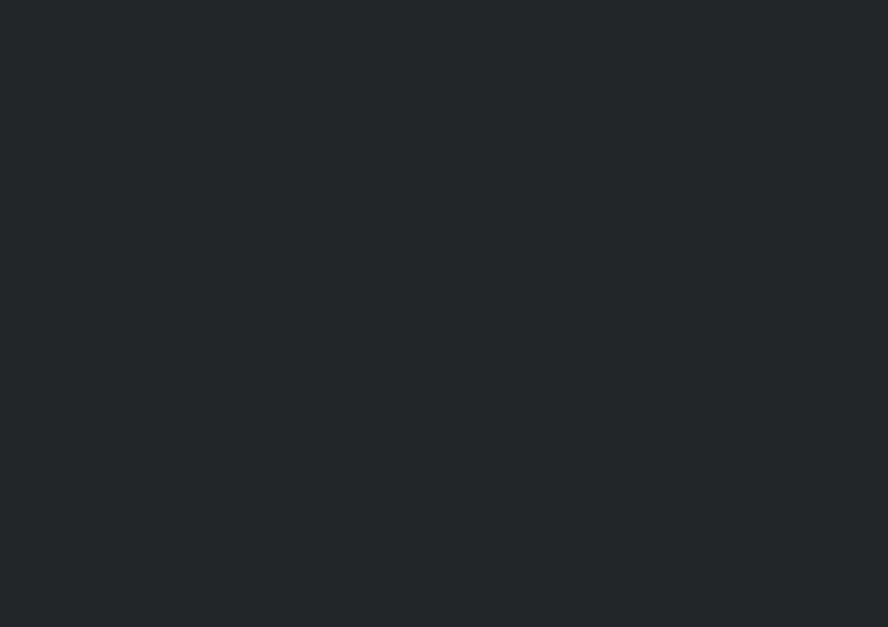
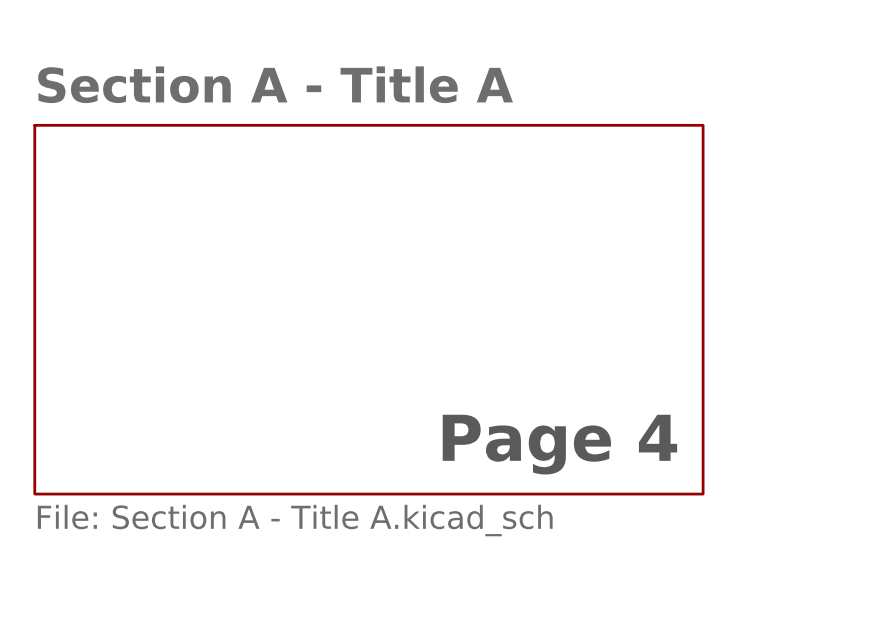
sheet Section A - Title A: none -> File: Section A - Title A.kicad_sch (368, 309)
text: none -> Page 4 (559, 444)

